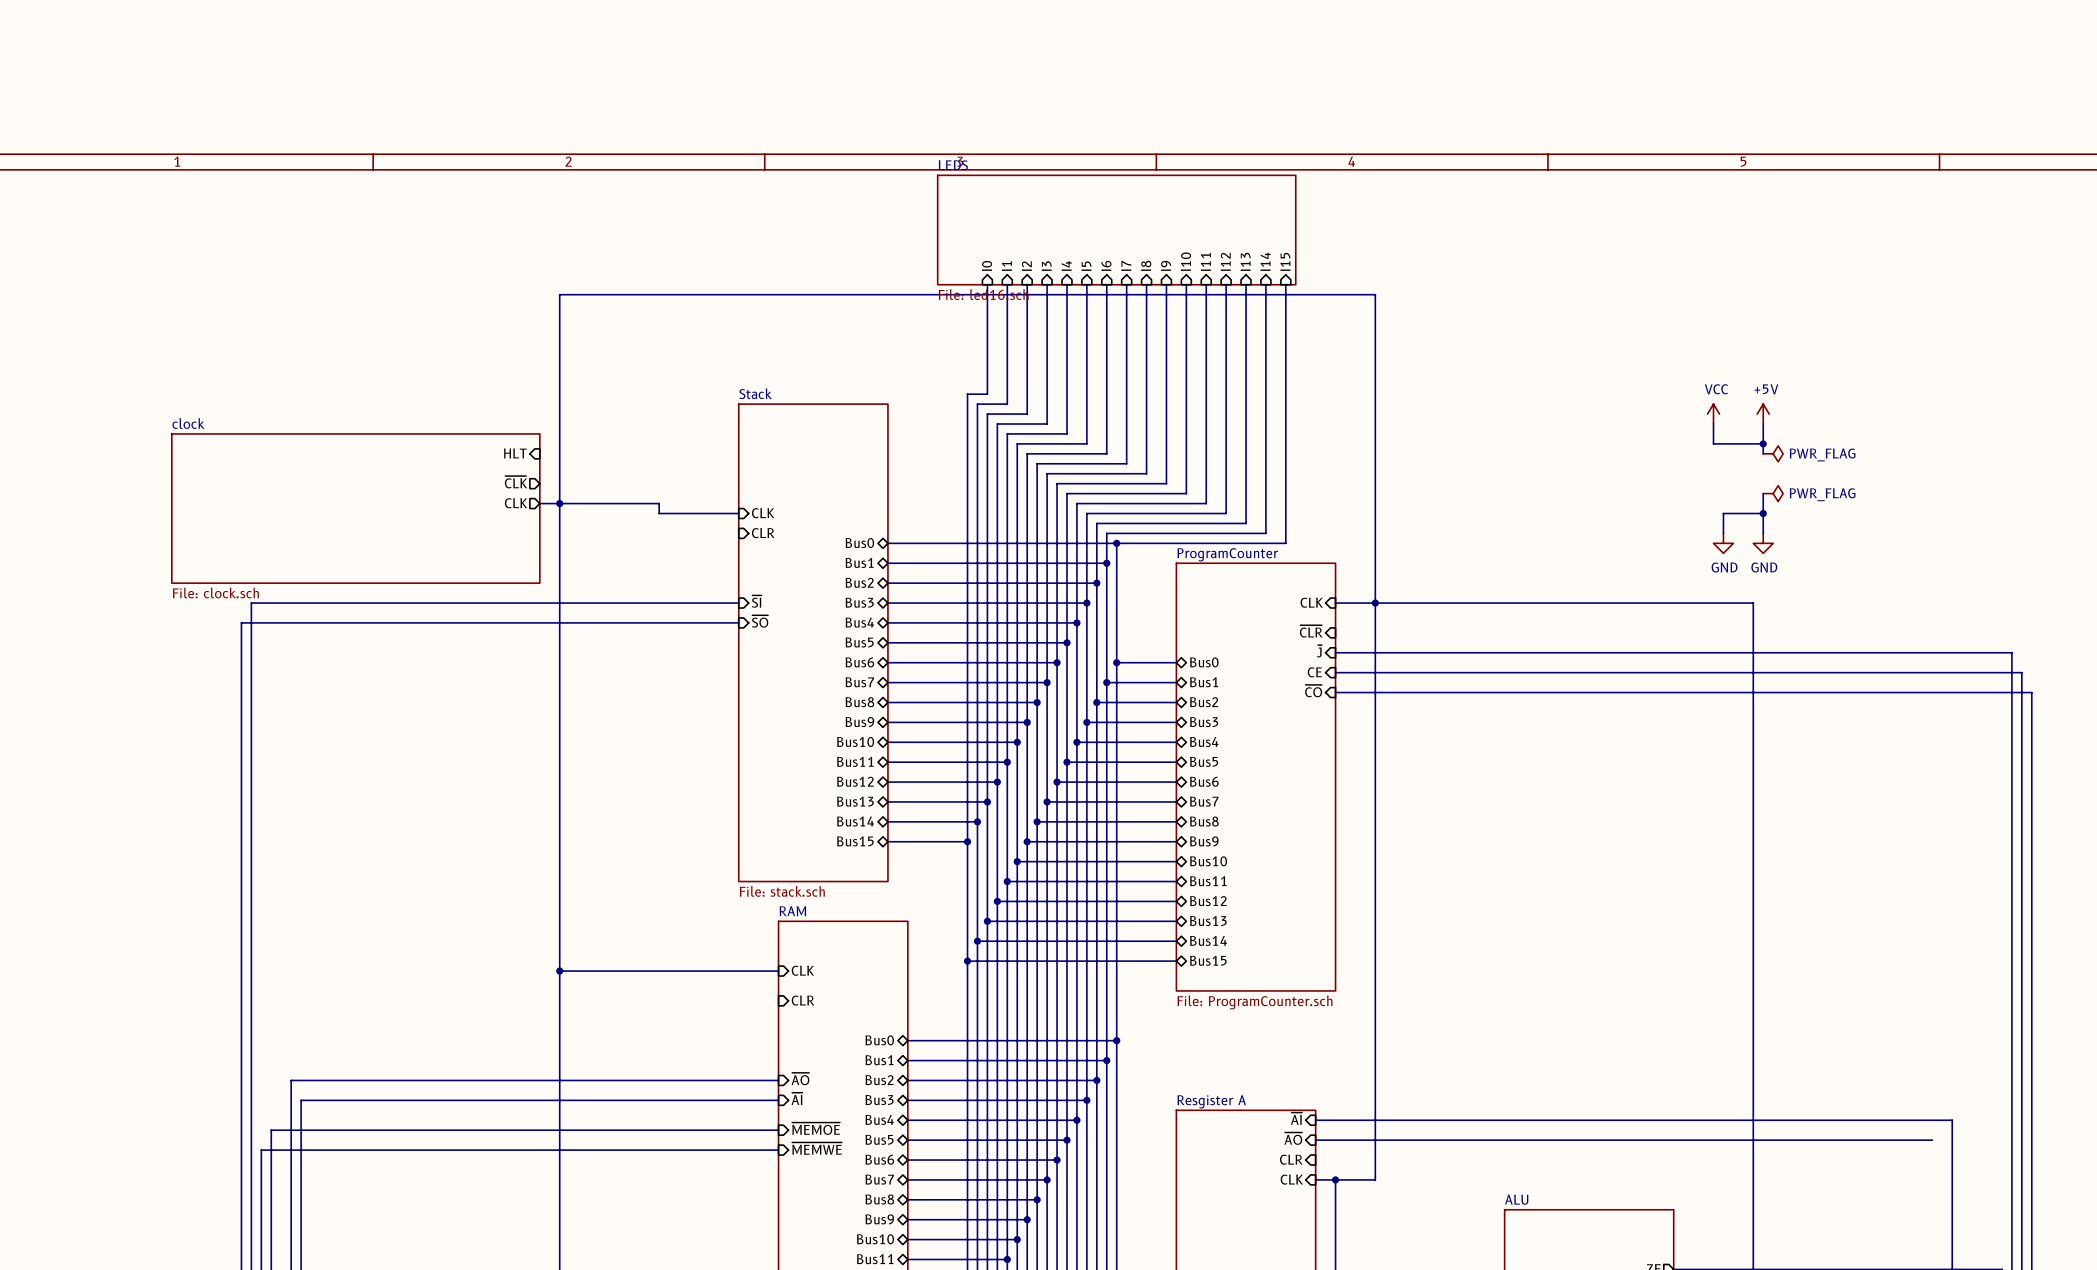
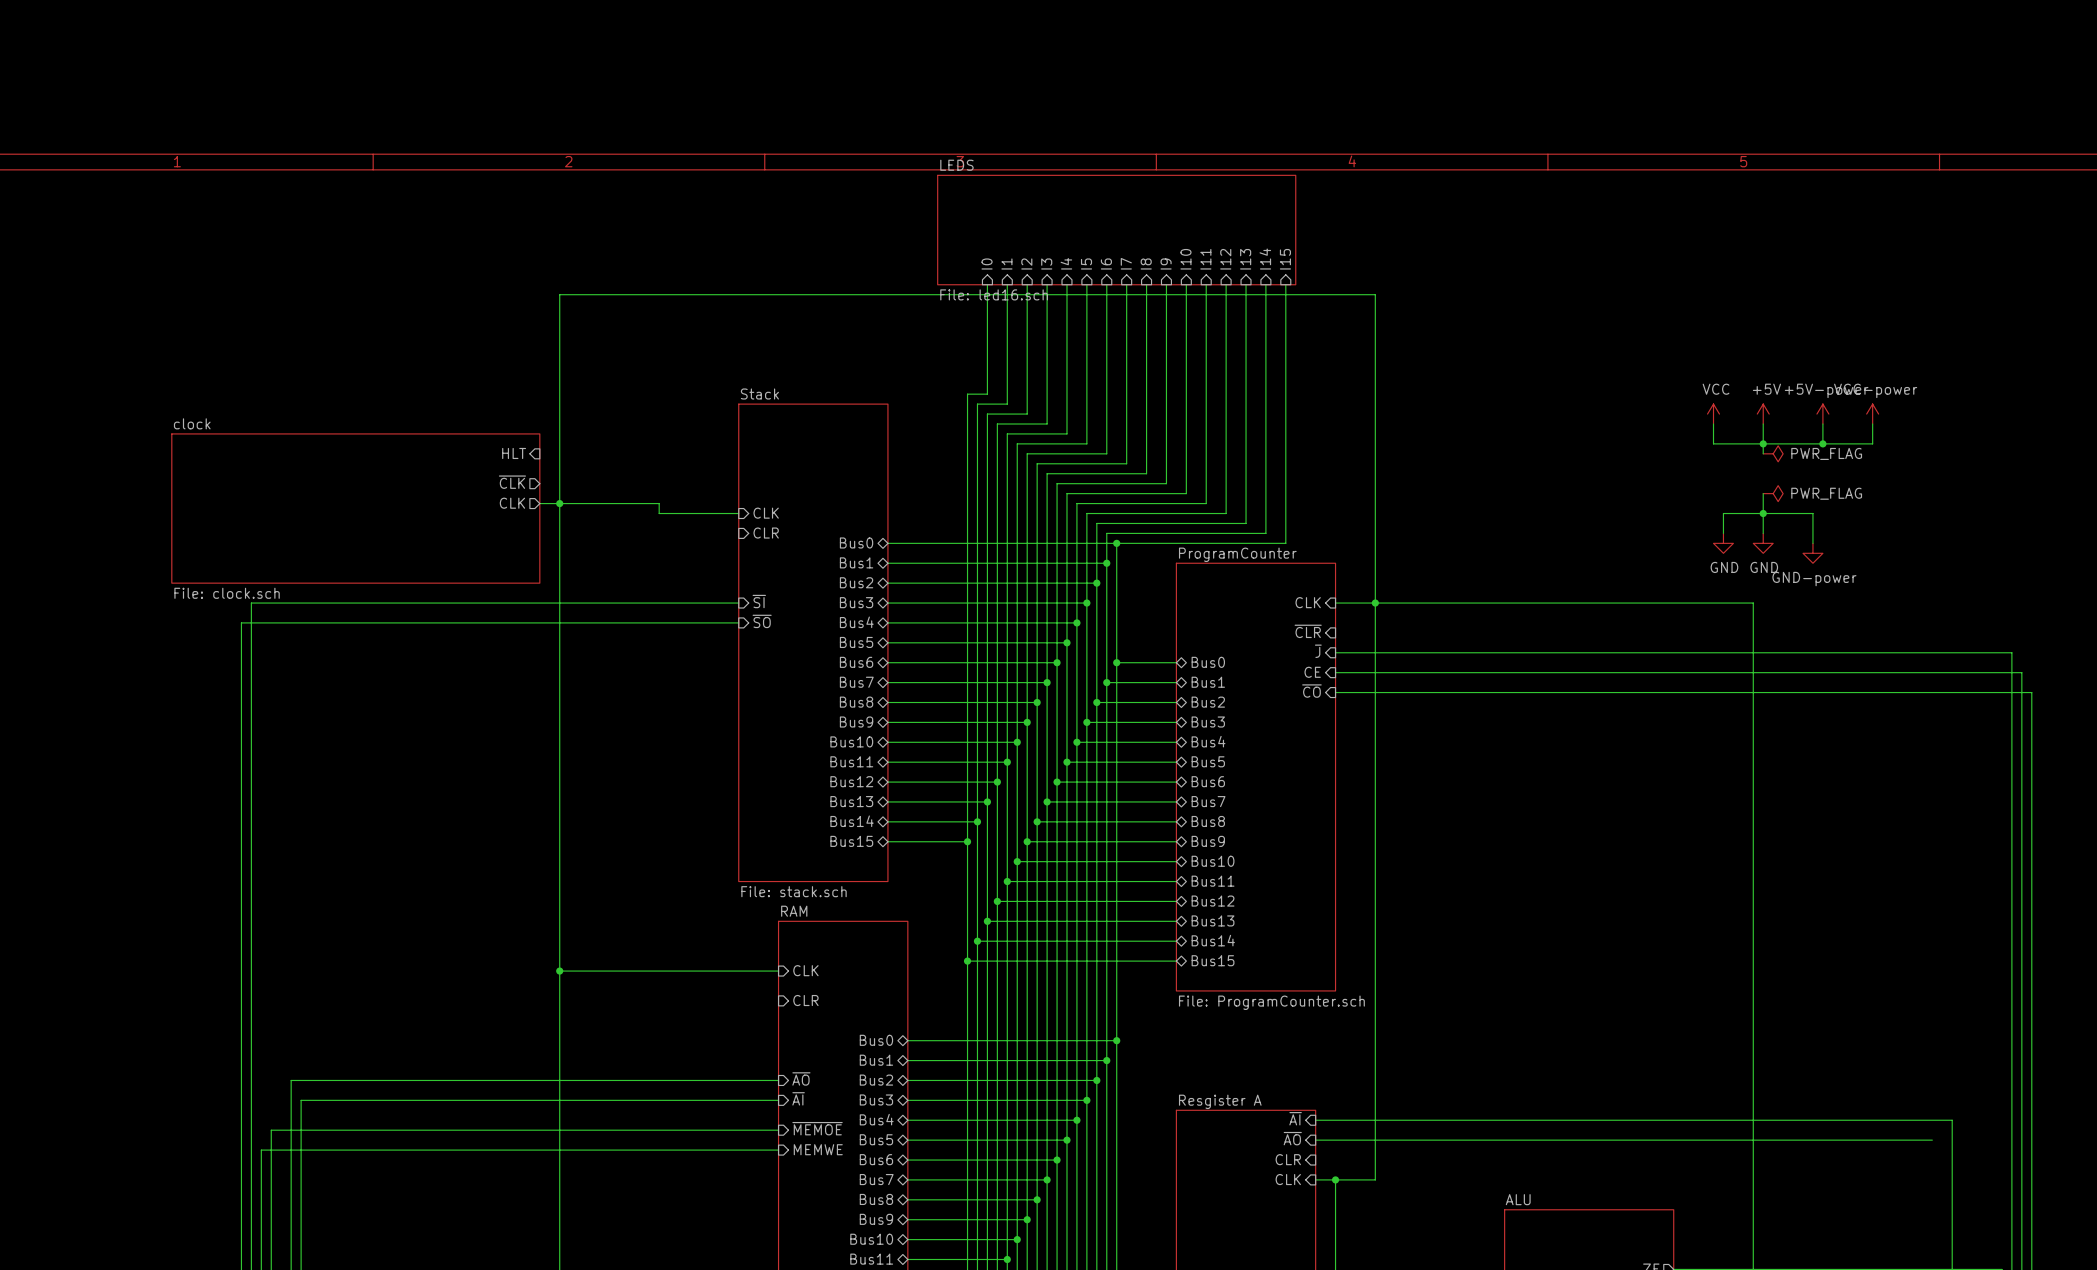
power symbol: none -> +5V-power (1822, 414)
power symbol: none -> VCC-power (1872, 414)
wire: none -> (1822, 424) (1822, 443)
wire: none -> (1872, 424) (1872, 443) (1763, 443)
junction: none -> (1822, 443)
wire: none -> (1763, 513) (1812, 513) (1812, 543)
power symbol: none -> GND-power (1812, 553)
sheet pin: ~{MEMWE} (817, 1148) -> MEMWE (818, 1149)

